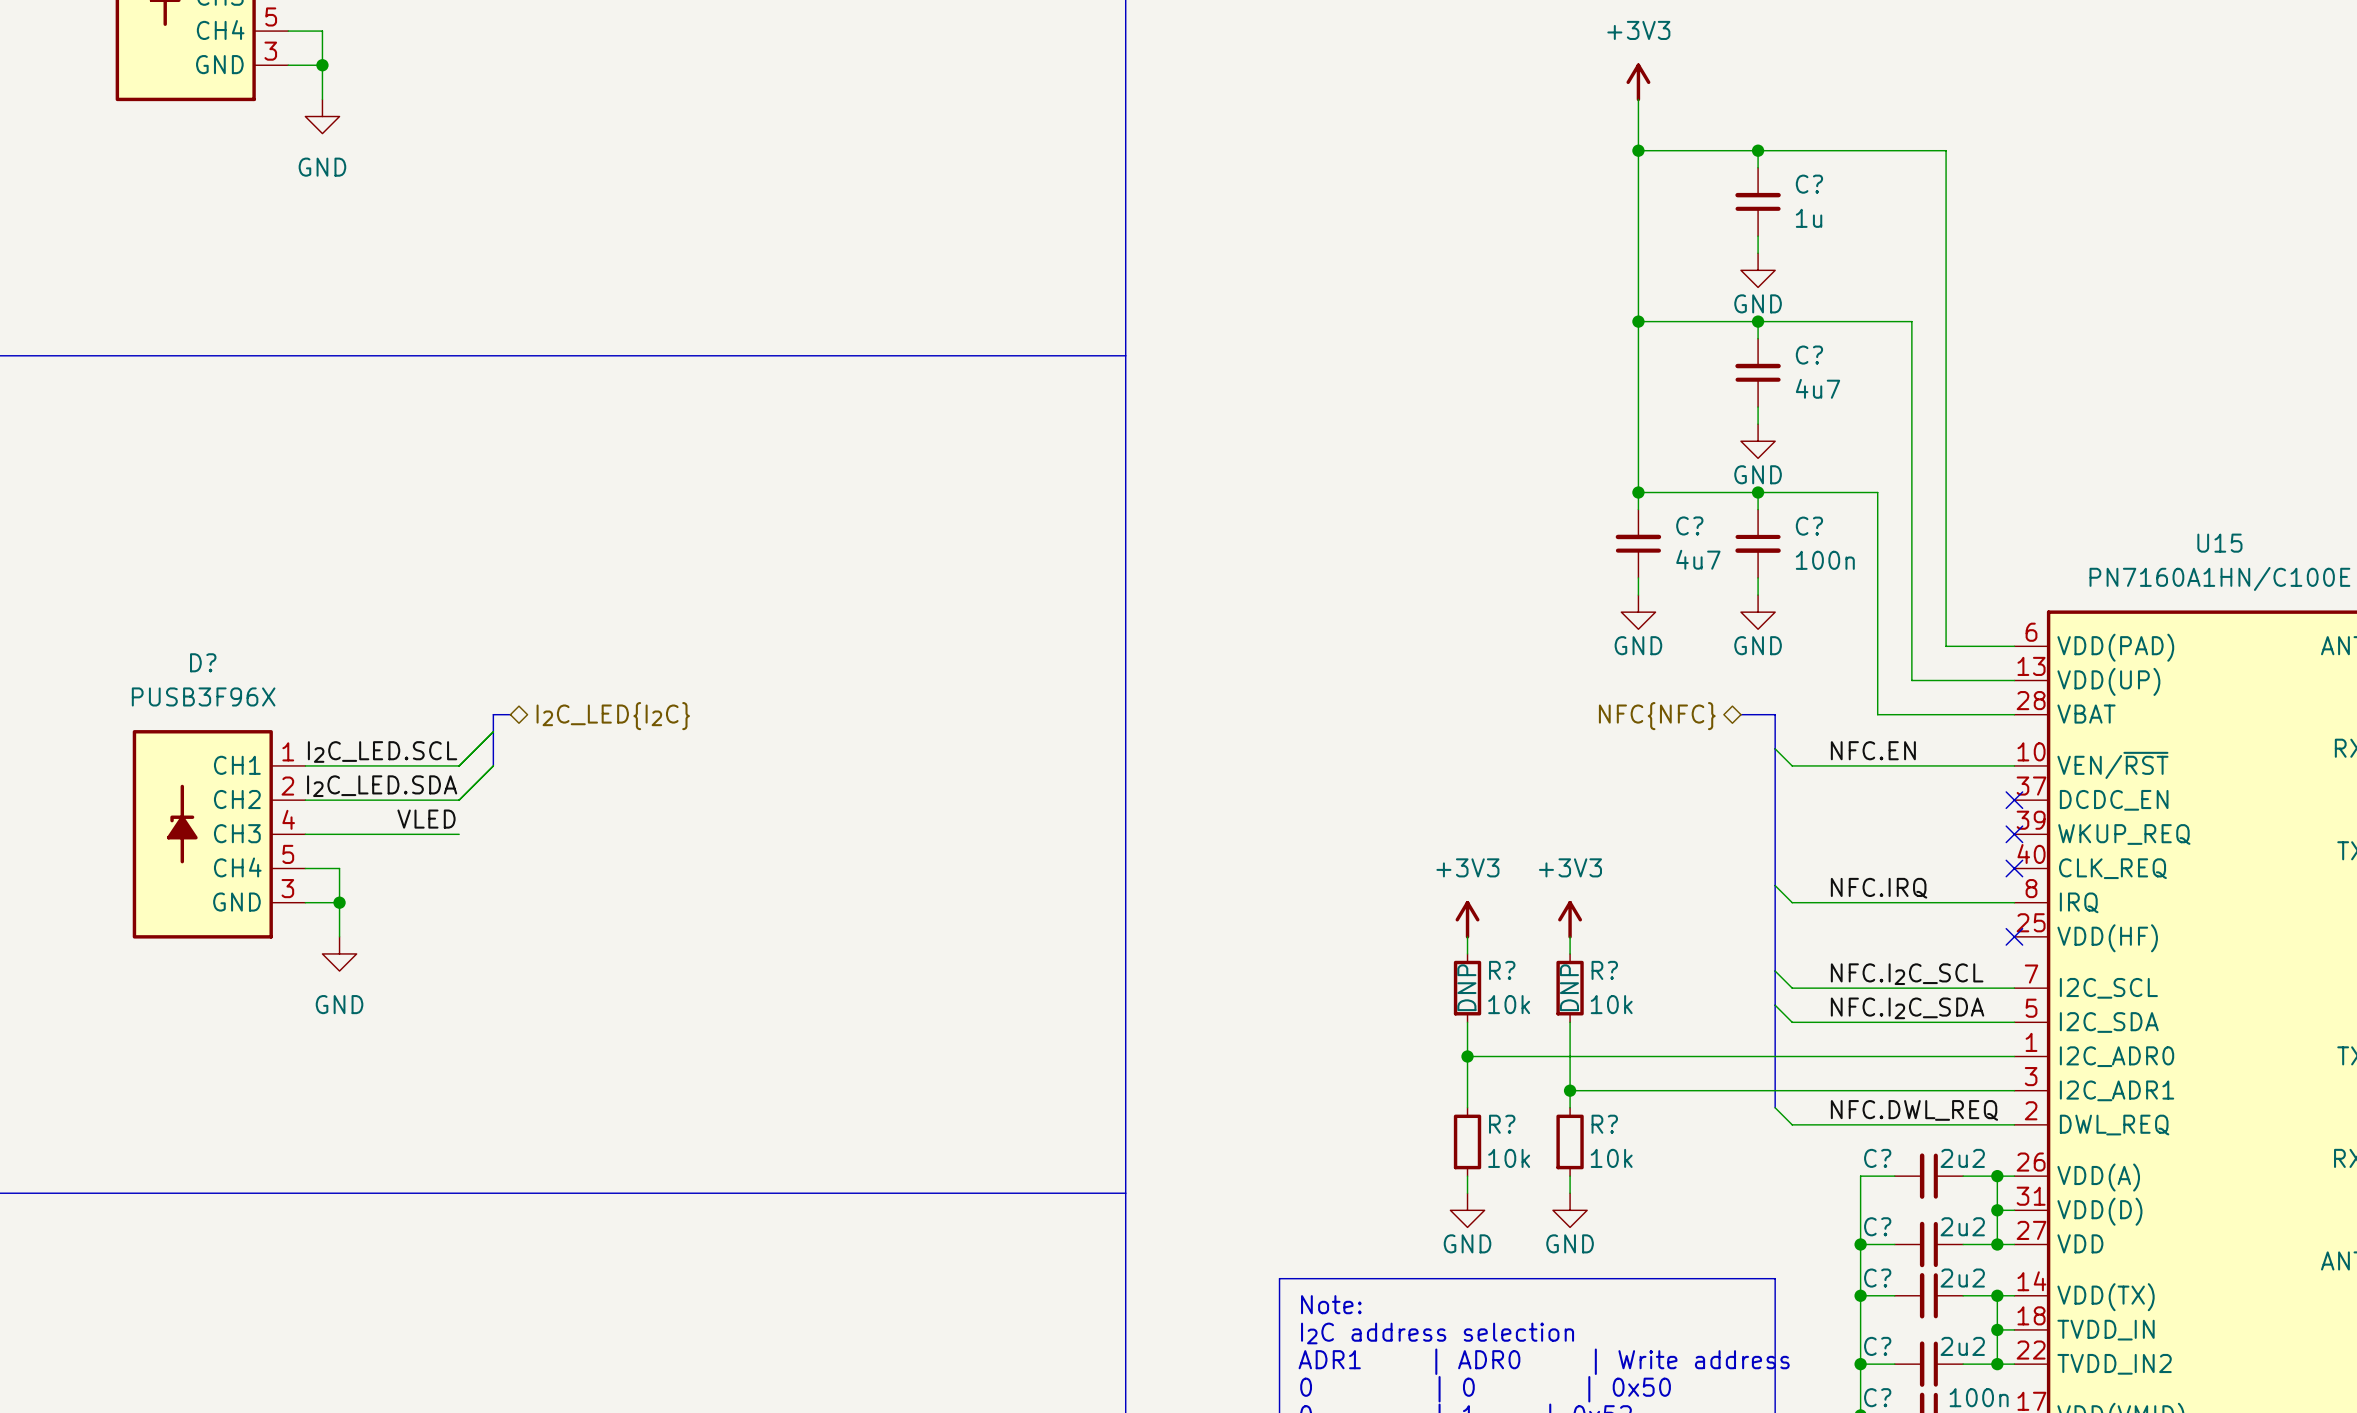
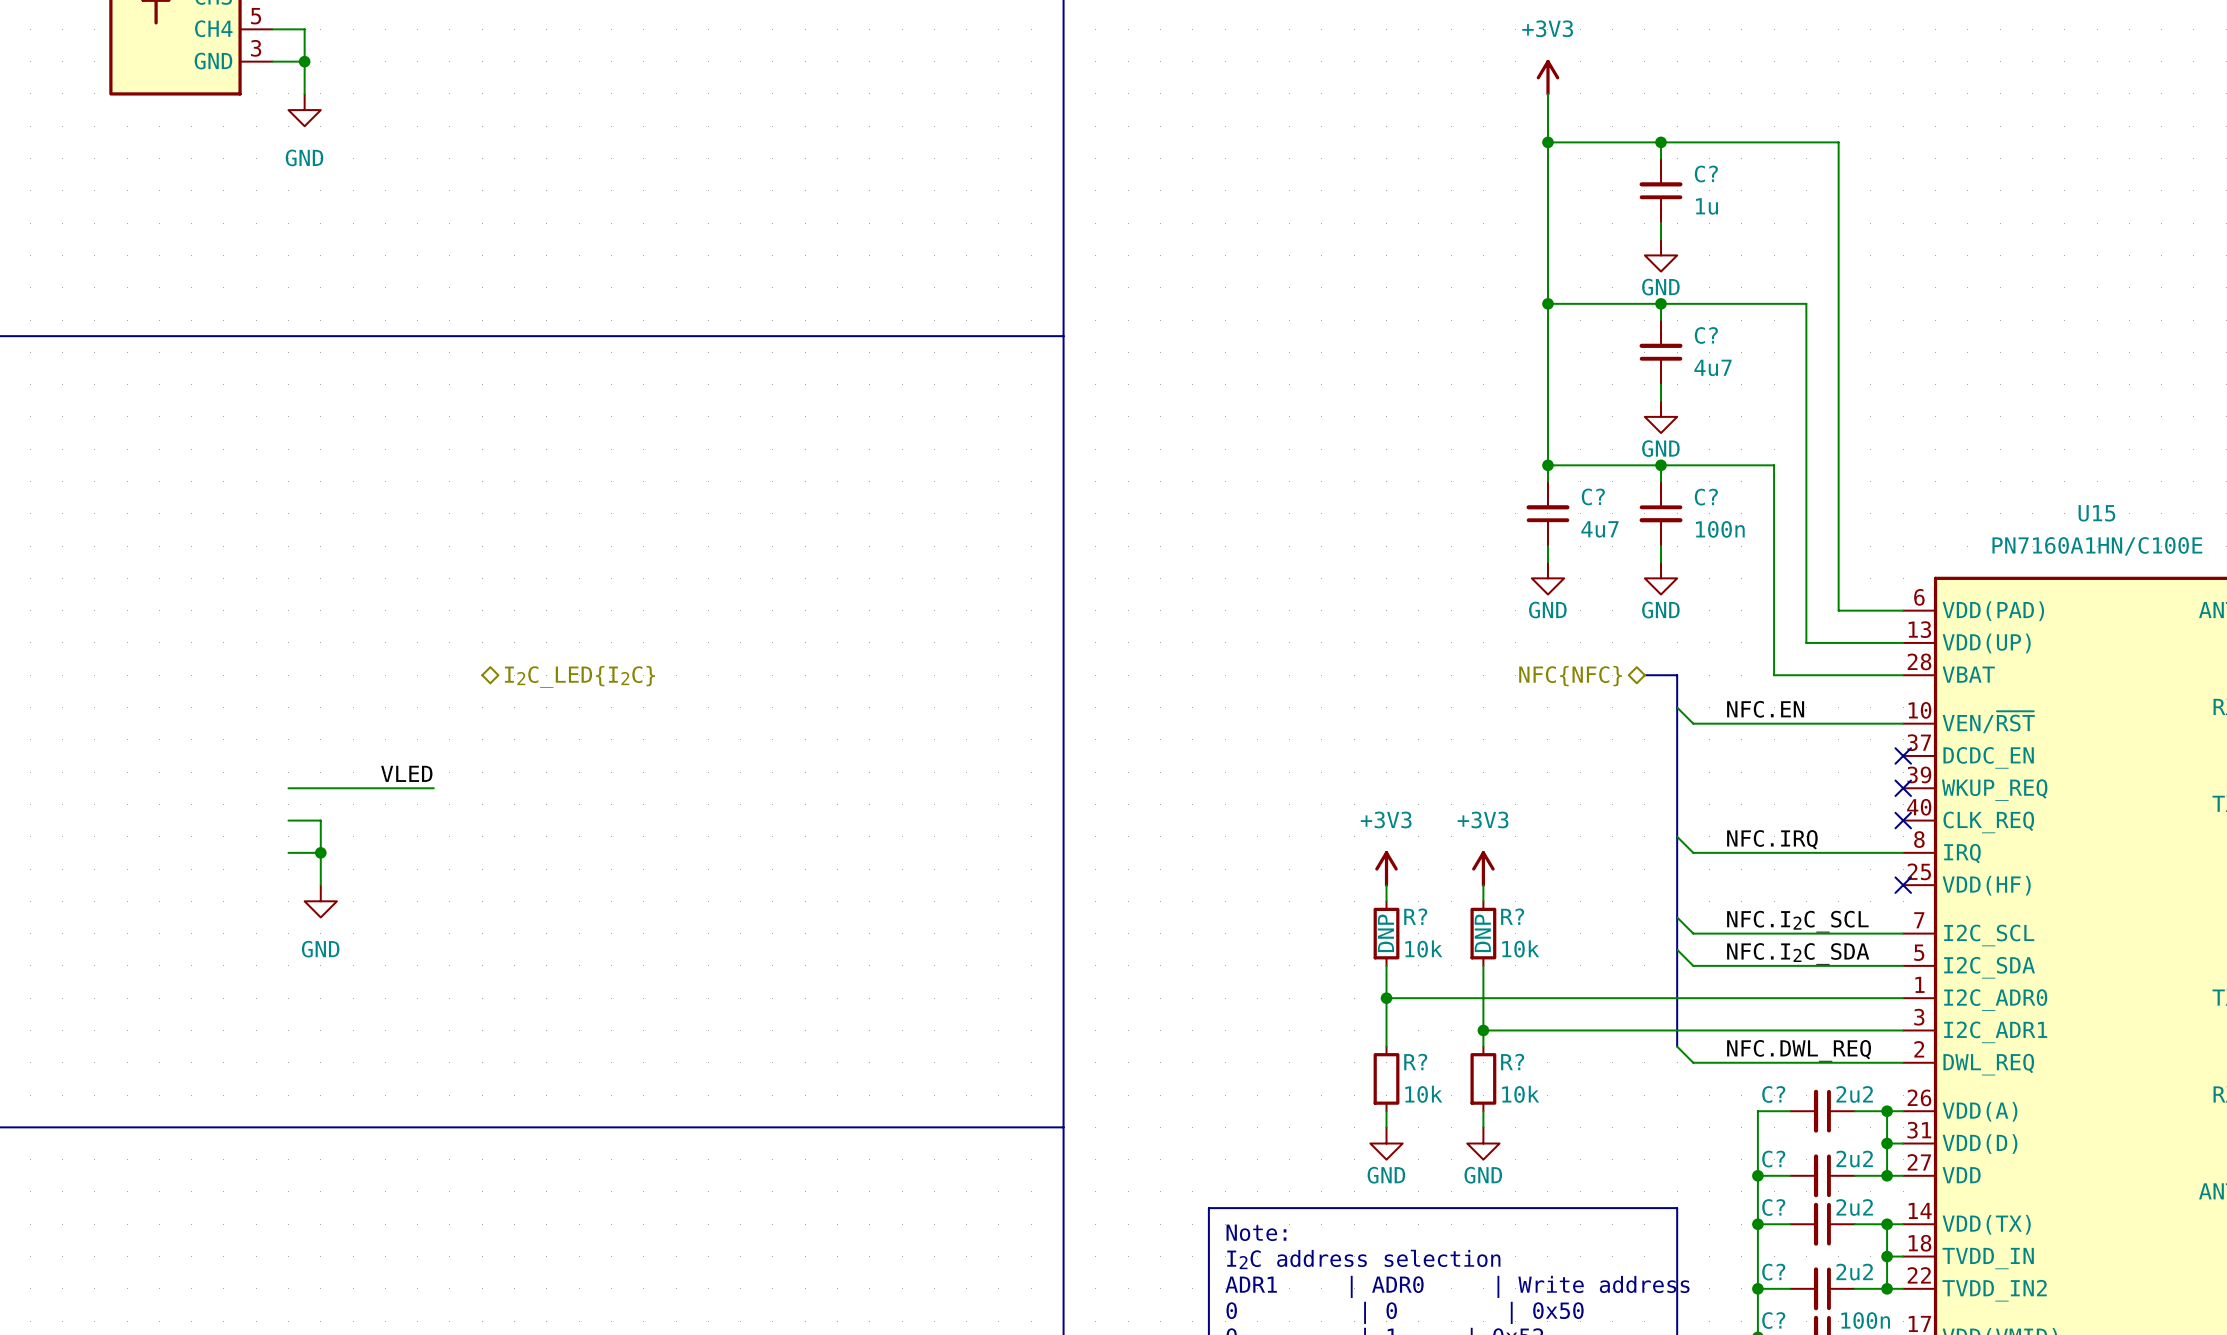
bus: (510, 714) (493, 714) (493, 765) -> none
wire: (493, 731) (459, 765) (305, 765) -> none
label: I2C_LED.SCL (382, 751) -> none
wire: (493, 765) (459, 800) (305, 800) -> none
label: I2C_LED.SDA (382, 786) -> none
D?: (219, 834) -> none

